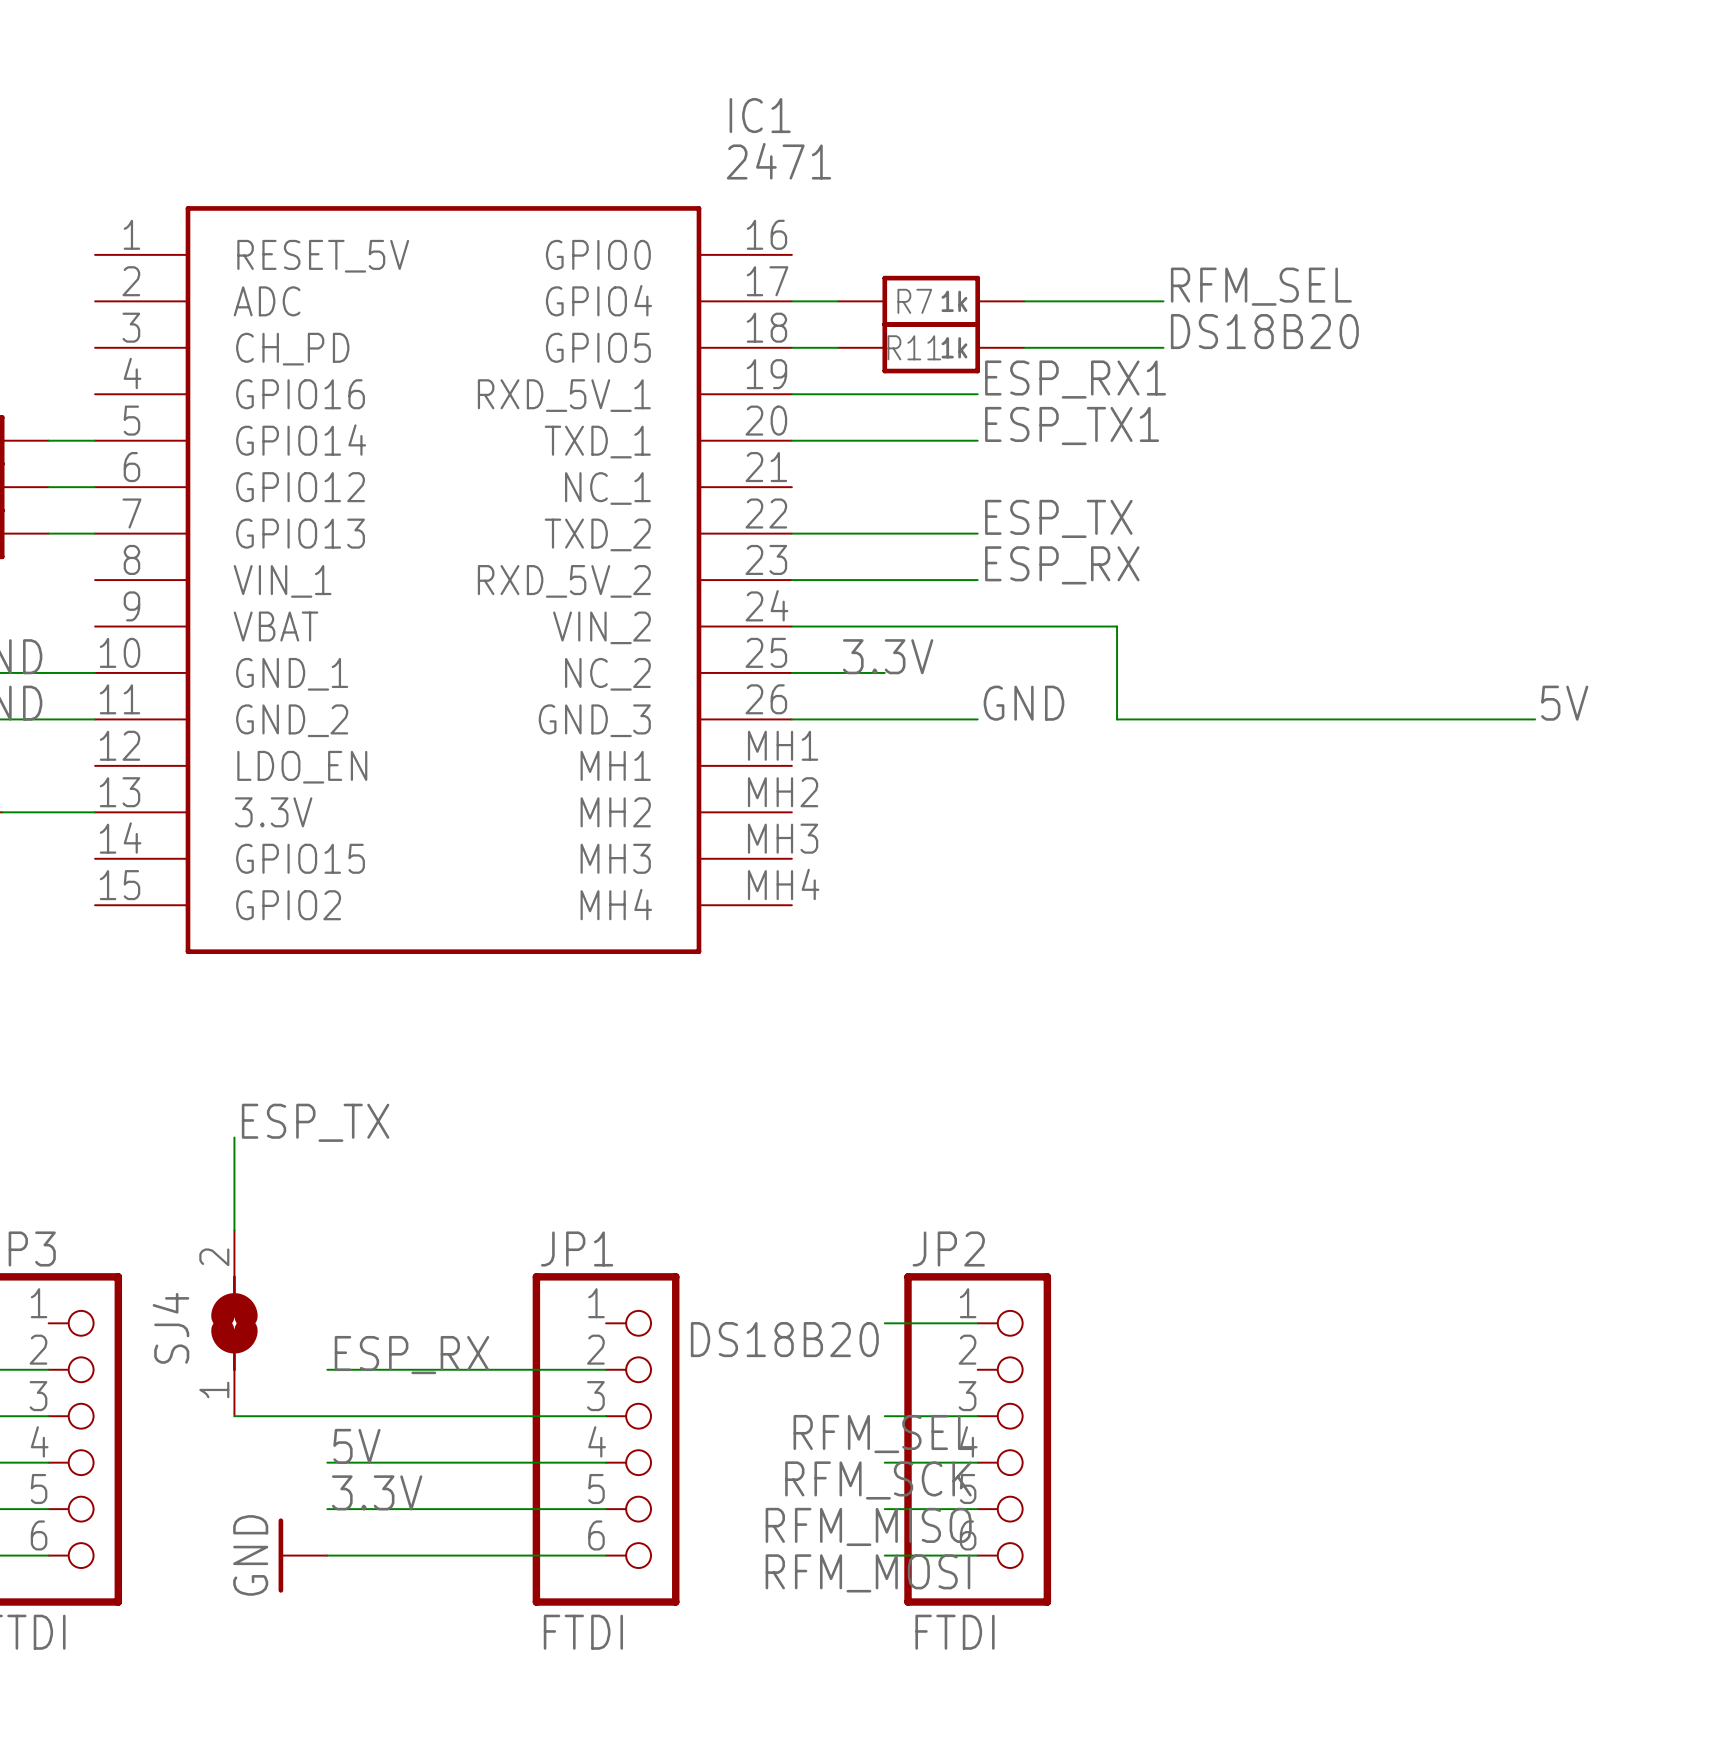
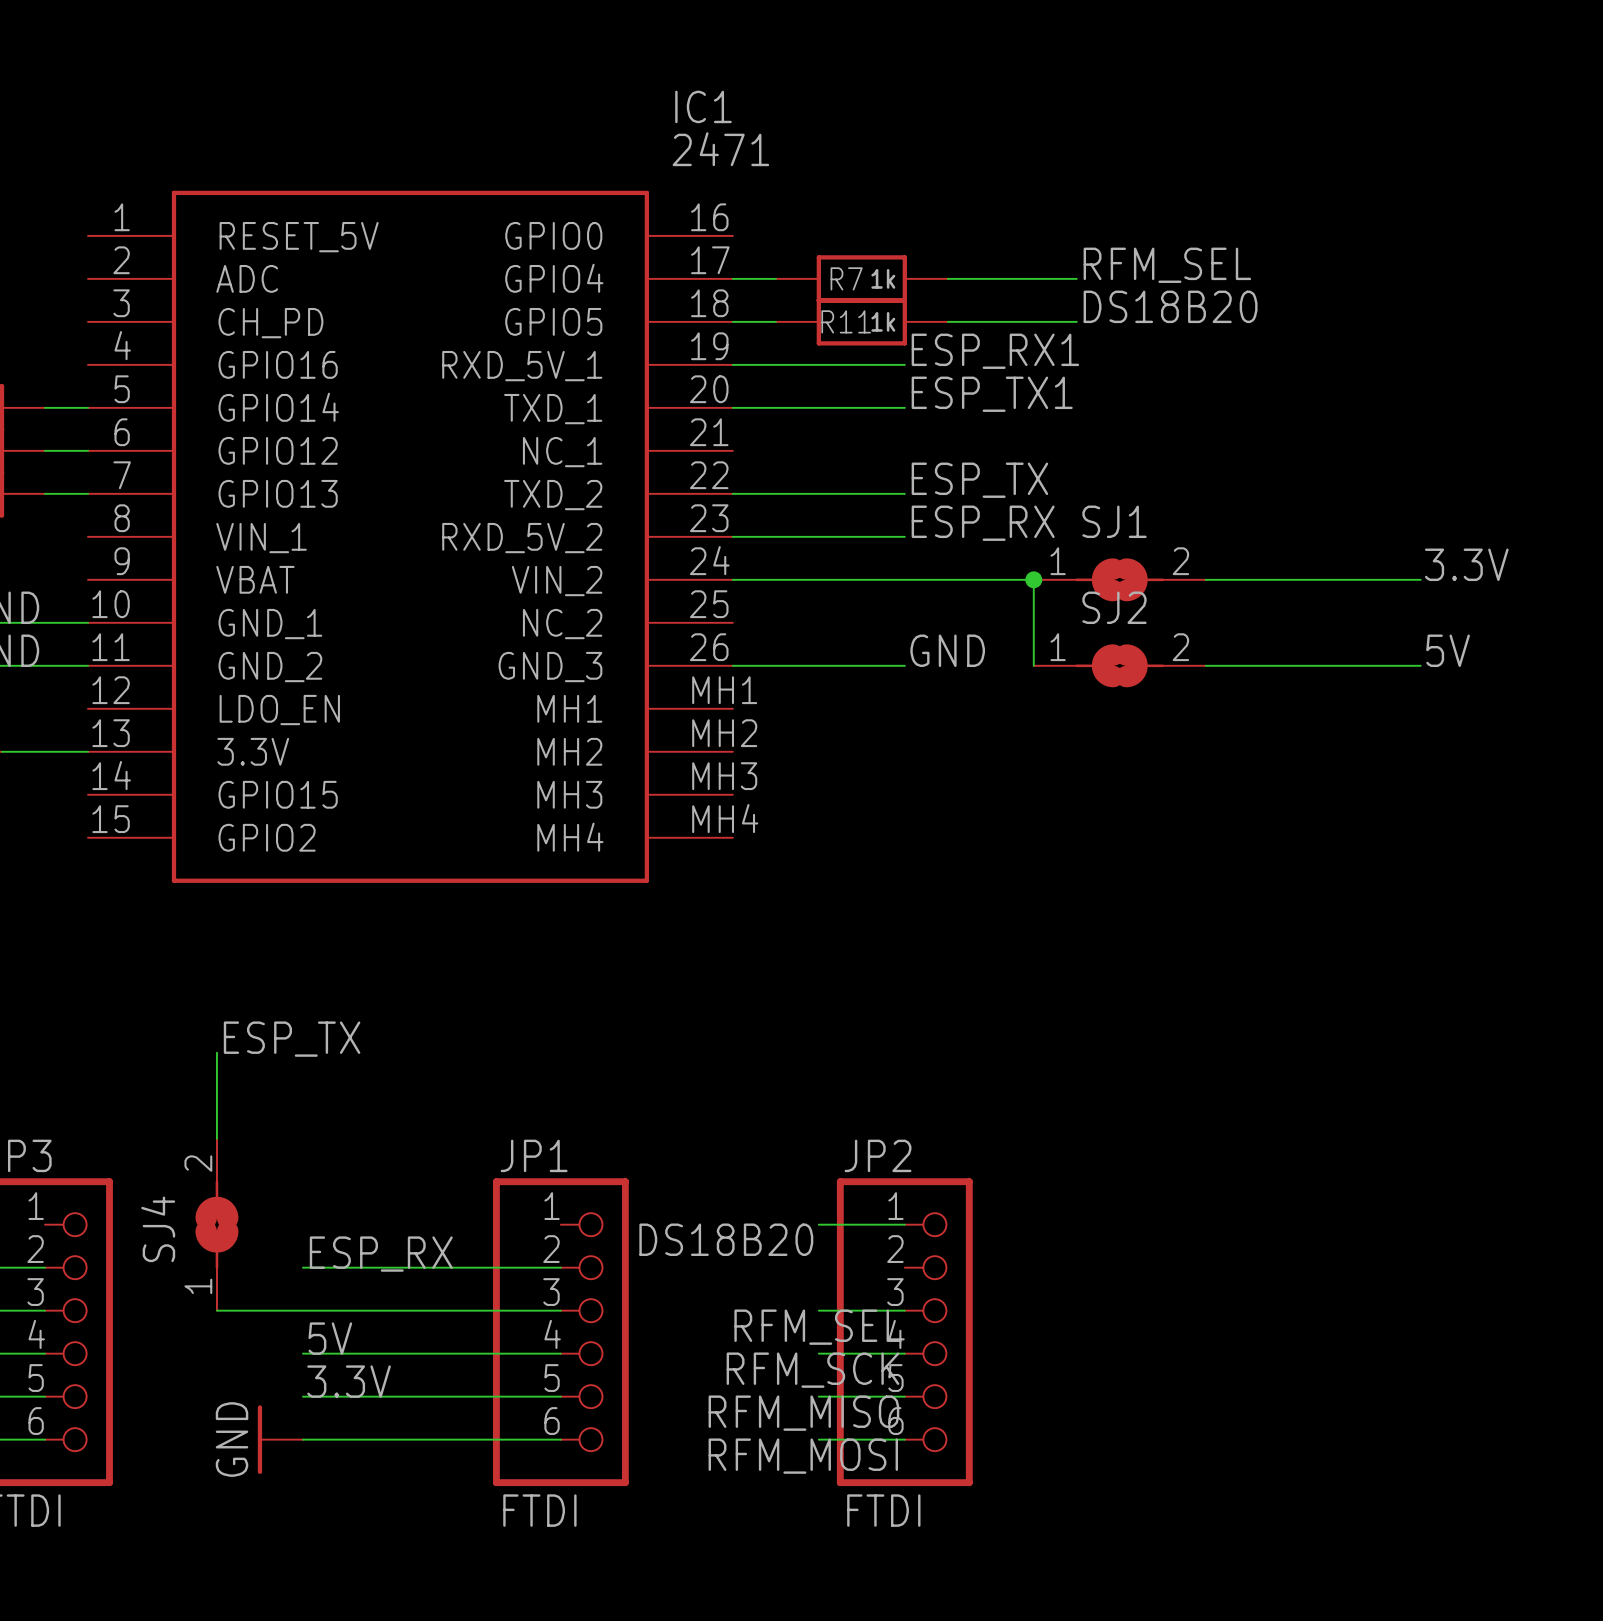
label: none -> 3.3V (1466, 564)
junction: none -> (1033, 579)
SJ1: none -> (1119, 579)
wire: none -> (1205, 579) (1420, 579)
label: 3.3V (888, 656) -> none
wire: (791, 672) (884, 672) -> none
SJ2: none -> (1119, 665)

